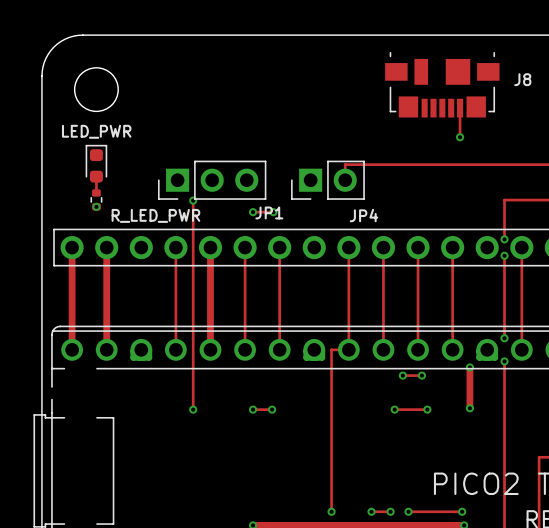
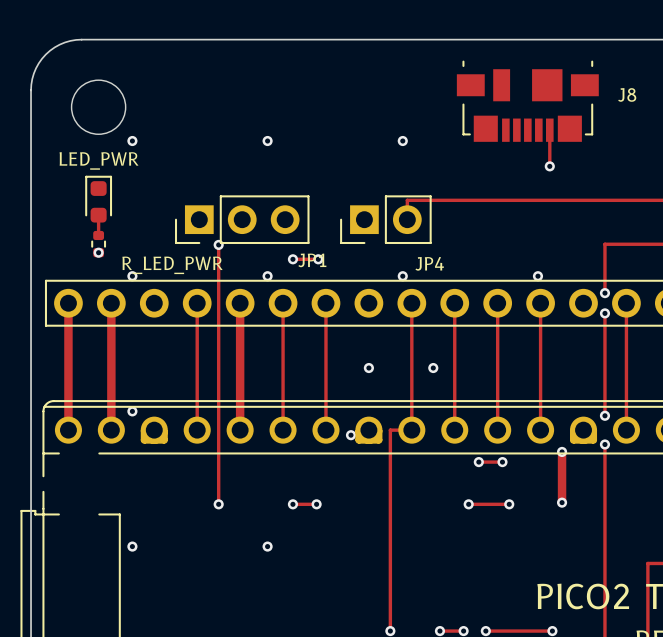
via: none -> (132, 141)
via: none -> (267, 141)
via: none -> (402, 141)
via: none -> (132, 276)
via: none -> (267, 276)
via: none -> (402, 276)
via: none -> (537, 276)
via: none -> (368, 368)
via: none -> (433, 368)
via: none -> (132, 411)
via: none -> (350, 435)
via: none -> (132, 546)
via: none -> (267, 546)

